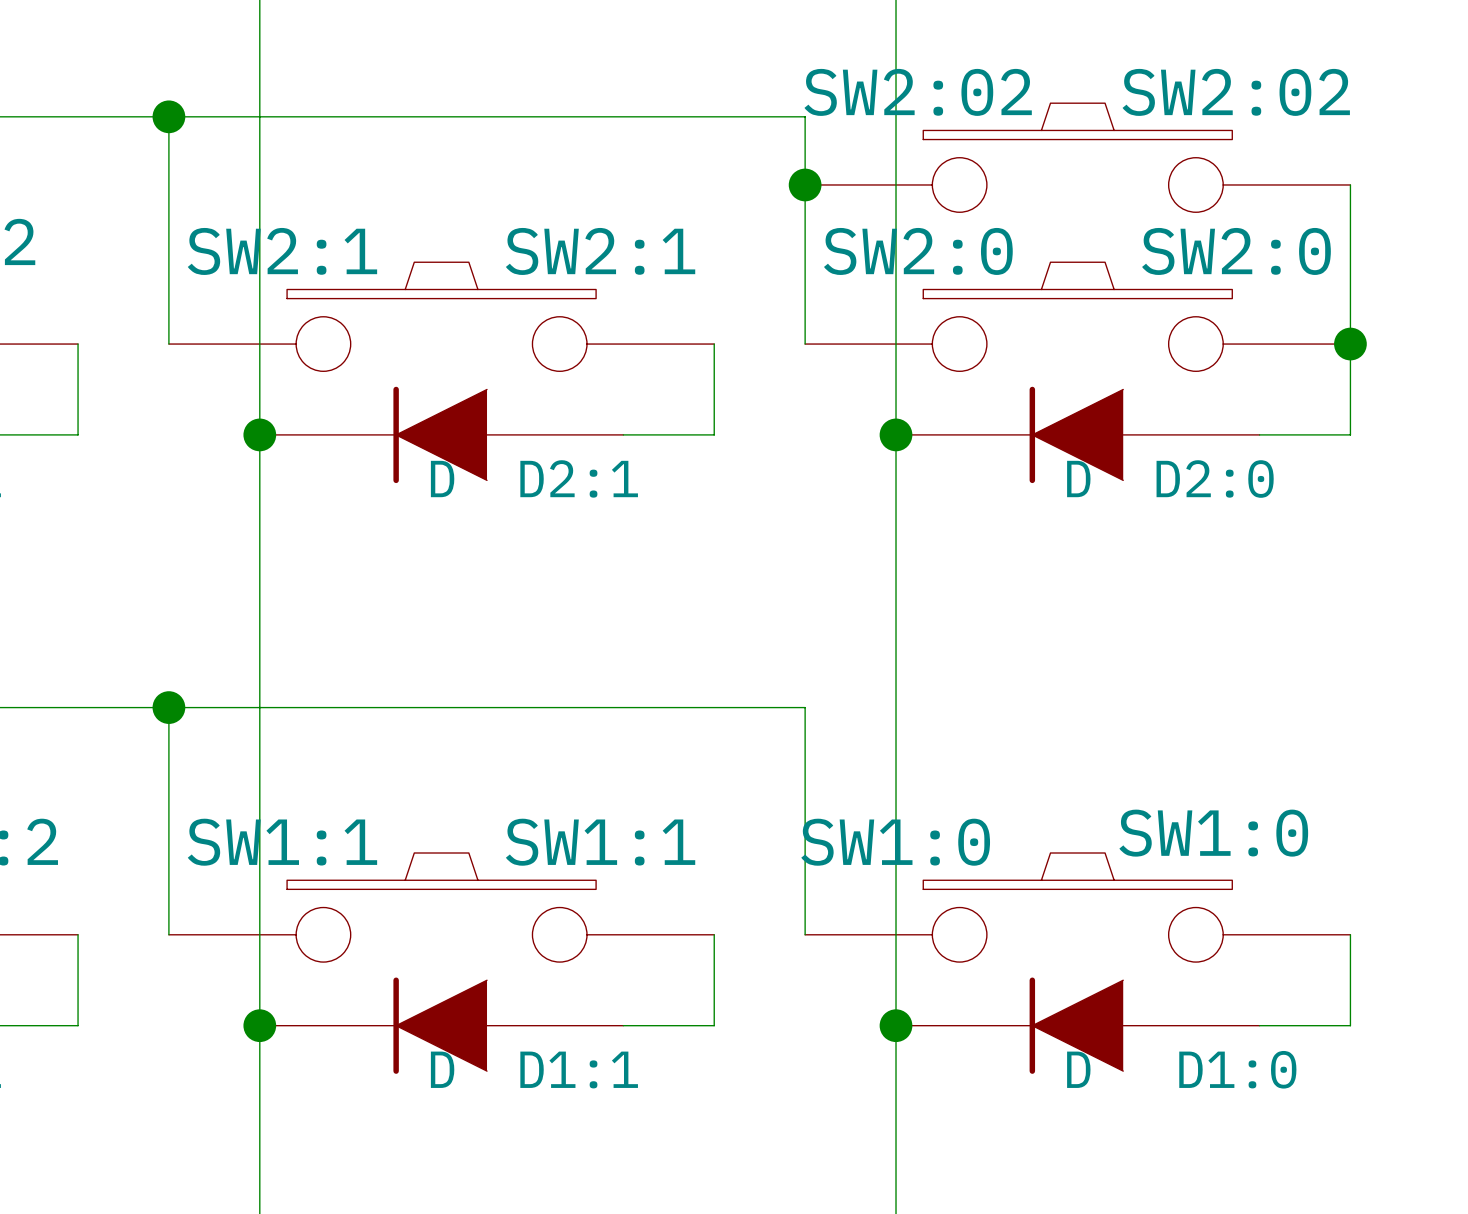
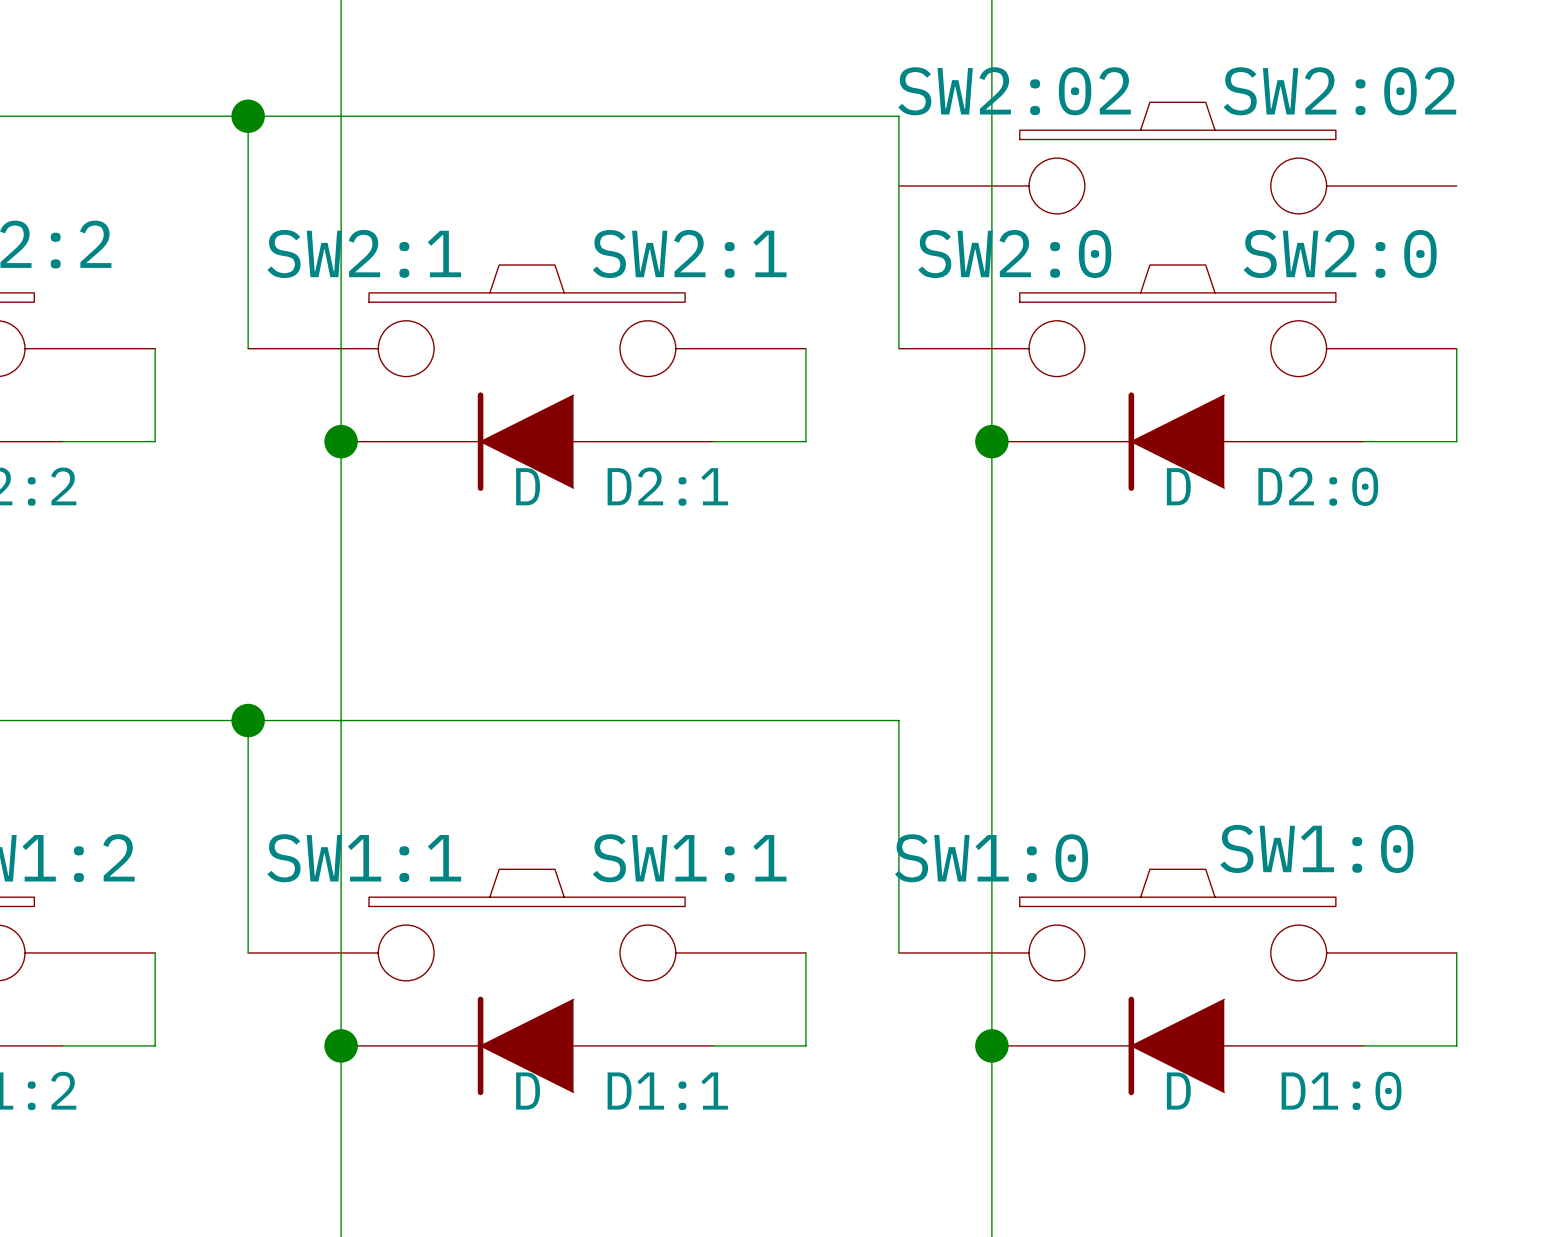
junction: (805, 184) -> none
wire: (1350, 184) (1350, 344) -> none
junction: (1350, 344) -> none

